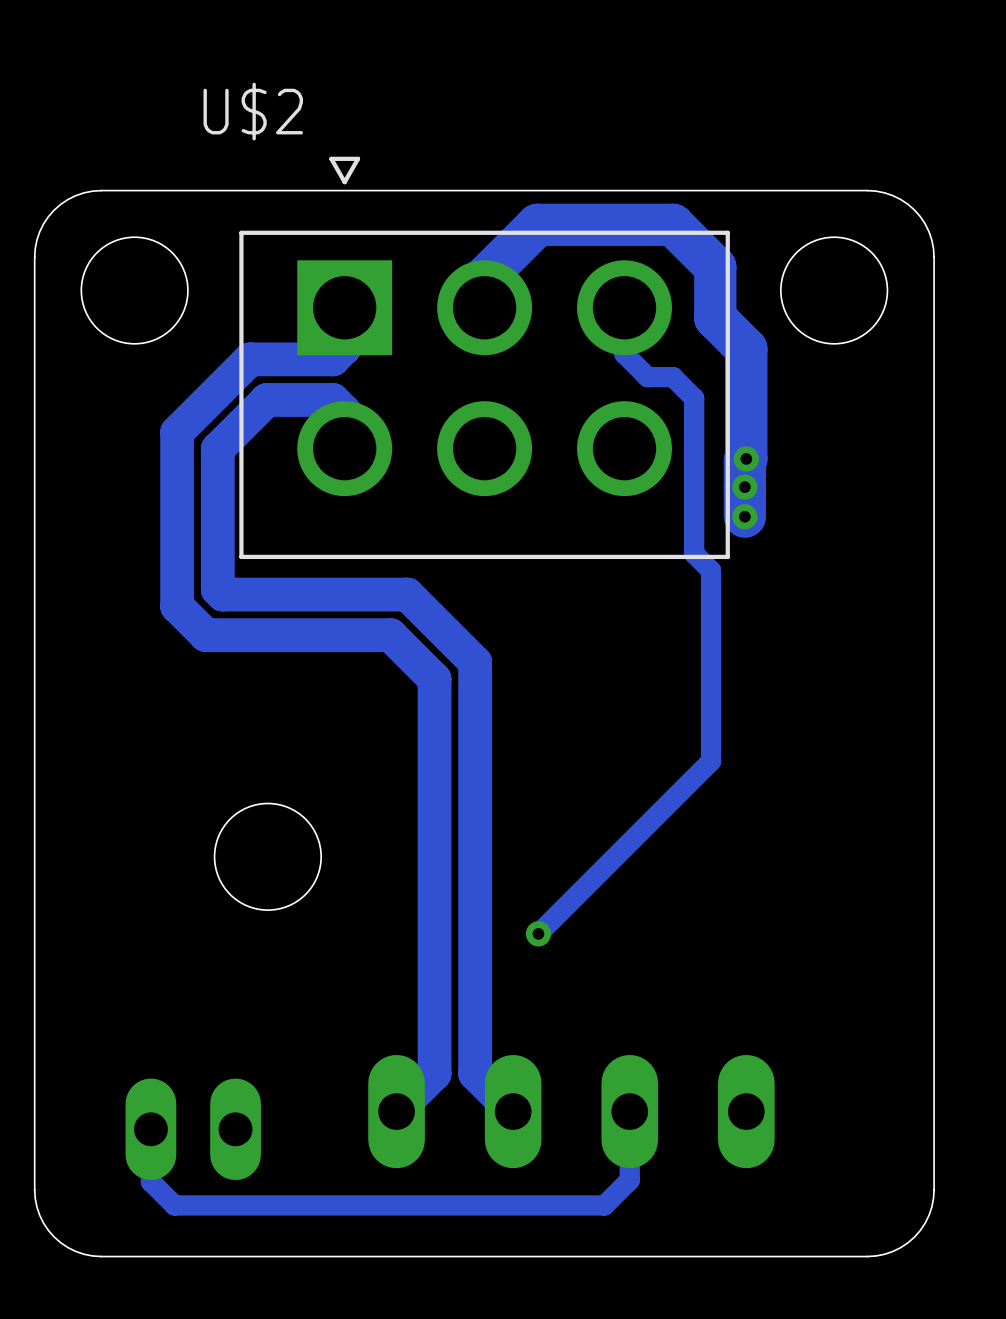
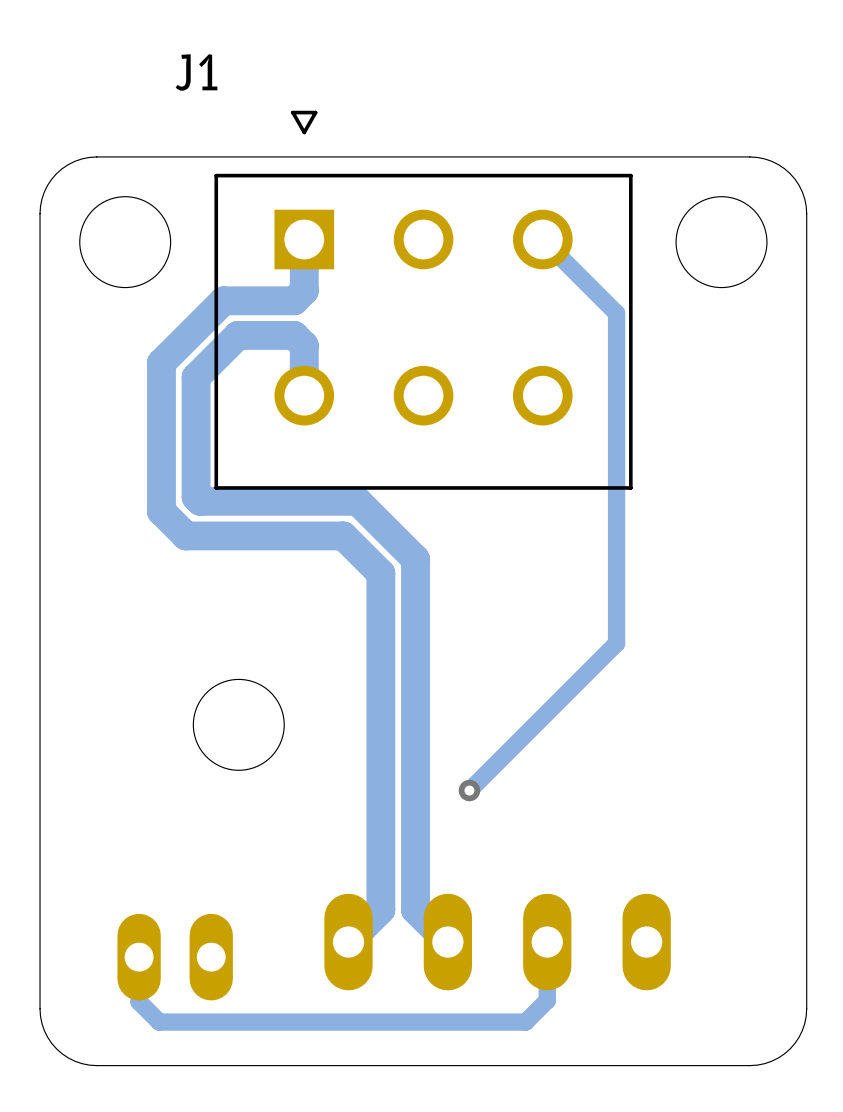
track: (484, 307) (484, 277) (537, 224) (672, 224) (715, 267) (715, 317) (746, 348) (744, 516) -> none
track: (624, 307) (624, 354) (647, 377) (672, 377) (694, 398) (694, 553) (711, 570) -> (542, 239) (616, 313) (616, 480)
U$2: (484, 357) -> none
J1: none -> (423, 300)
via: (746, 458) -> none
via: (744, 487) -> none
via: (744, 516) -> none

